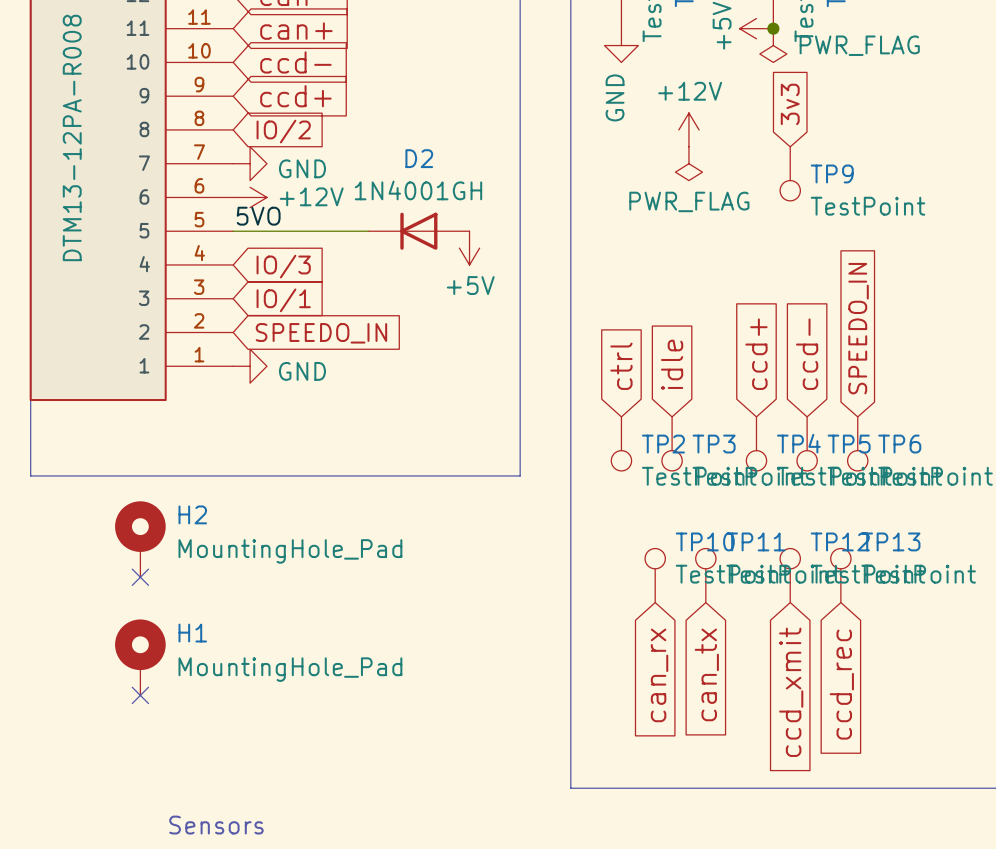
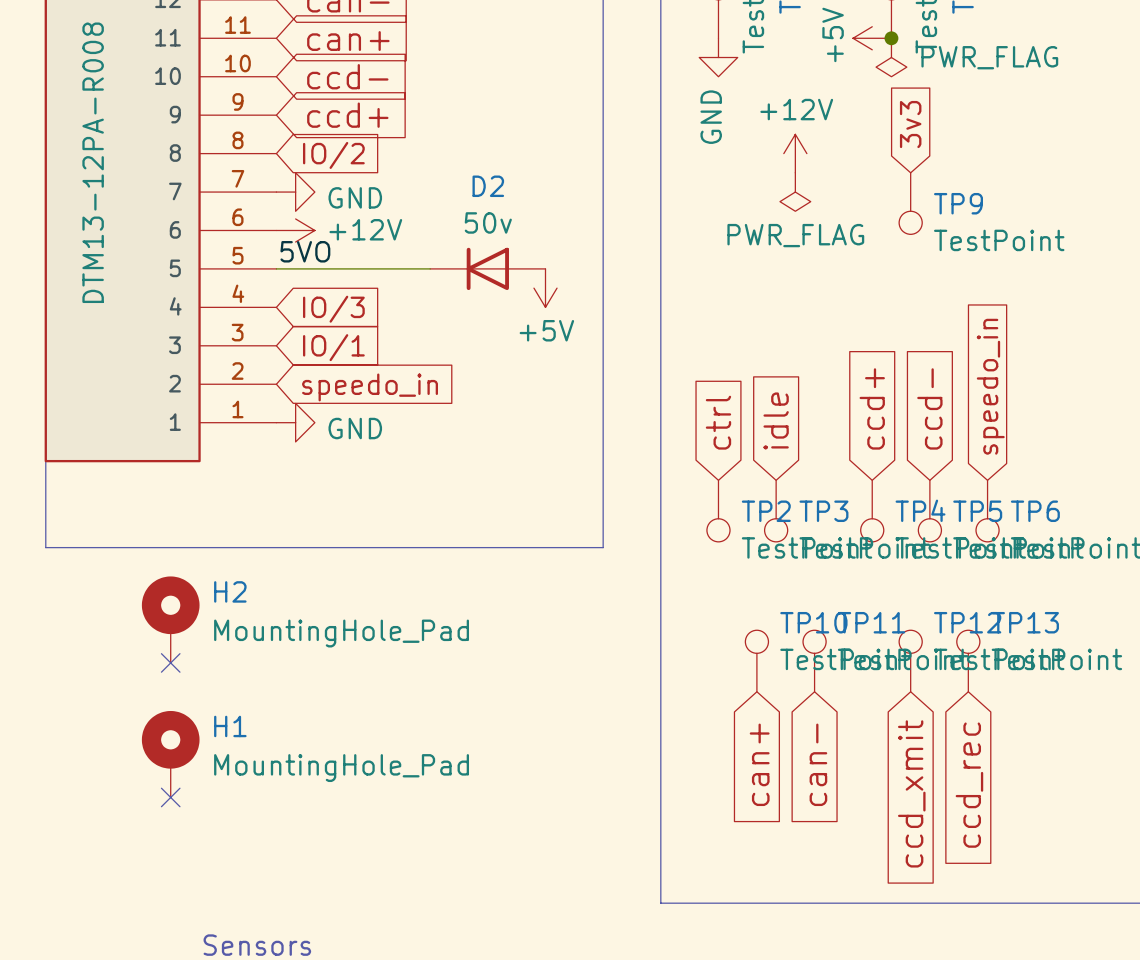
D2 value: 1N4001GH (418, 190) -> 50v (488, 222)
global label: SPEEDO_IN (858, 328) -> speedo_in (990, 386)
global label: SPEEDO_IN (321, 333) -> speedo_in (370, 387)
global label: can_tx (706, 674) -> can- (818, 764)
global label: can_rx (659, 675) -> can+ (759, 764)

